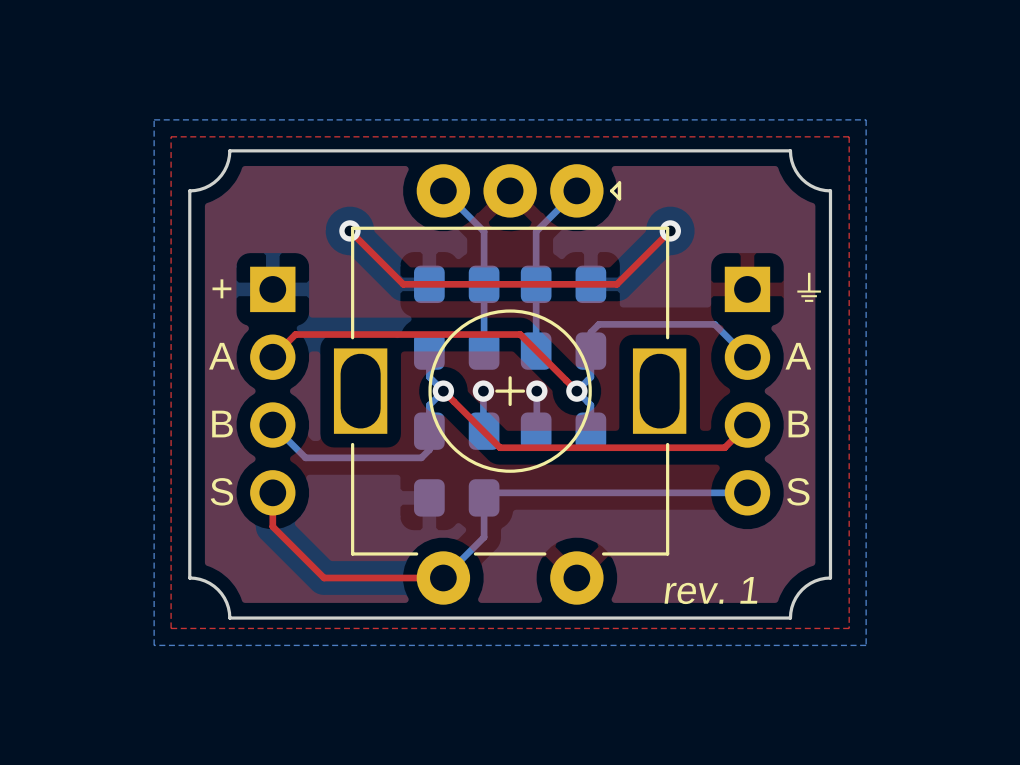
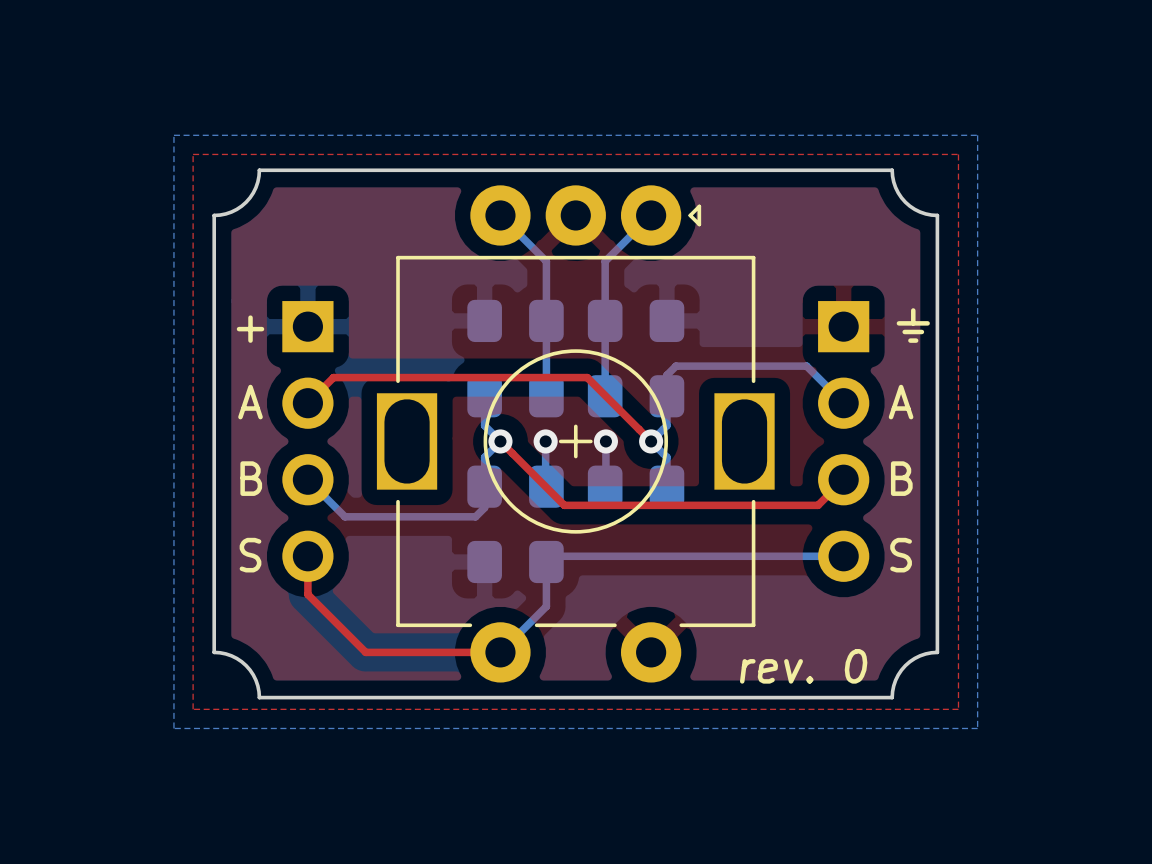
top track: (349, 230) (403, 284) (616, 284) (670, 230) -> none
via: (349, 230) -> none
via: (670, 230) -> none
text: rev. 1 (710, 590) -> rev. 0 (803, 666)

